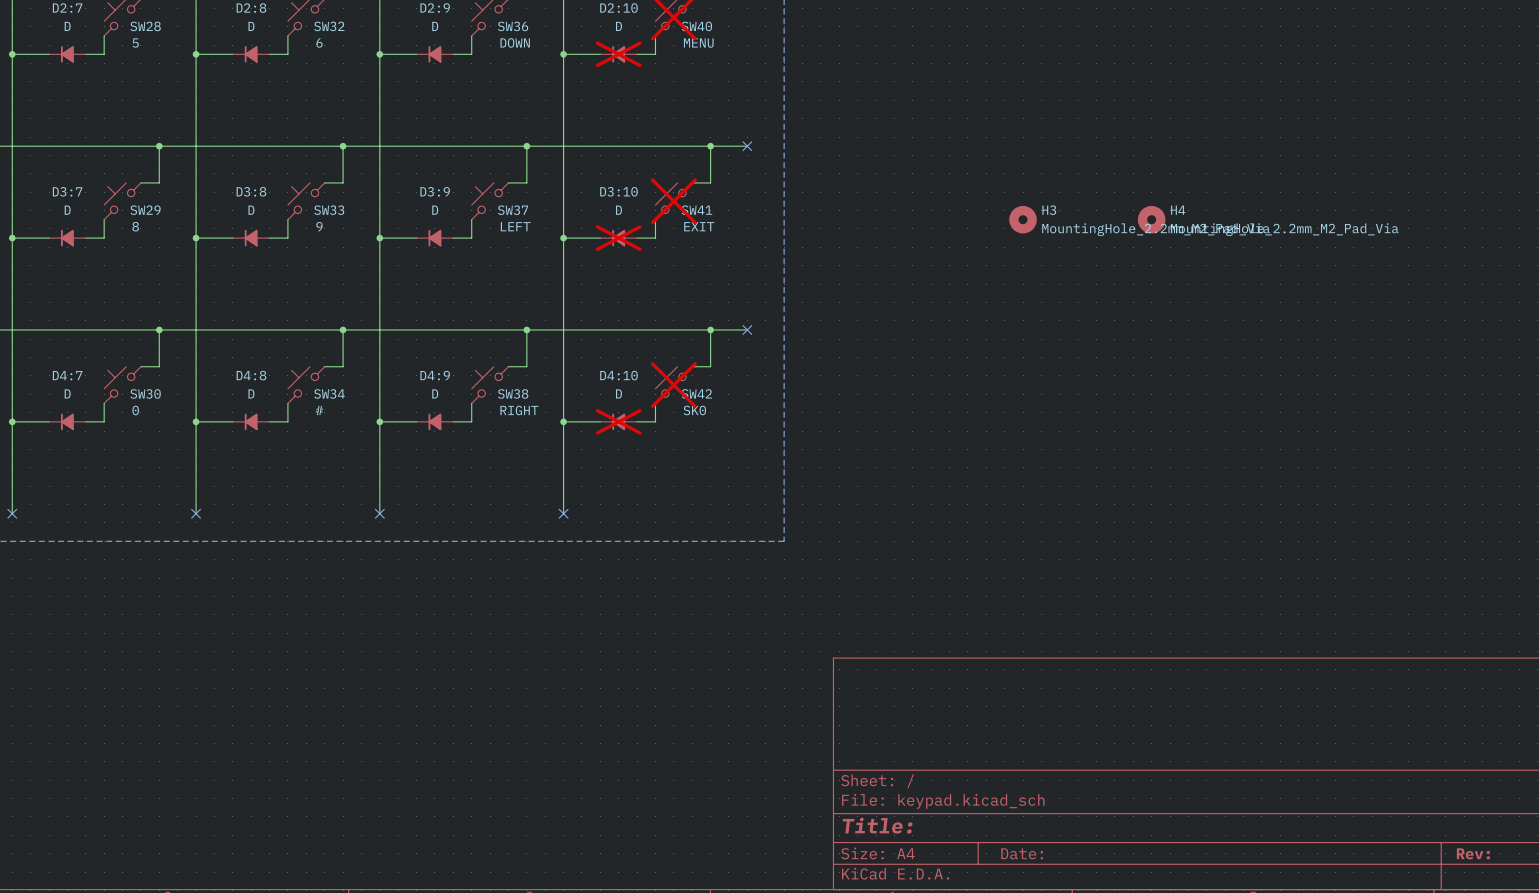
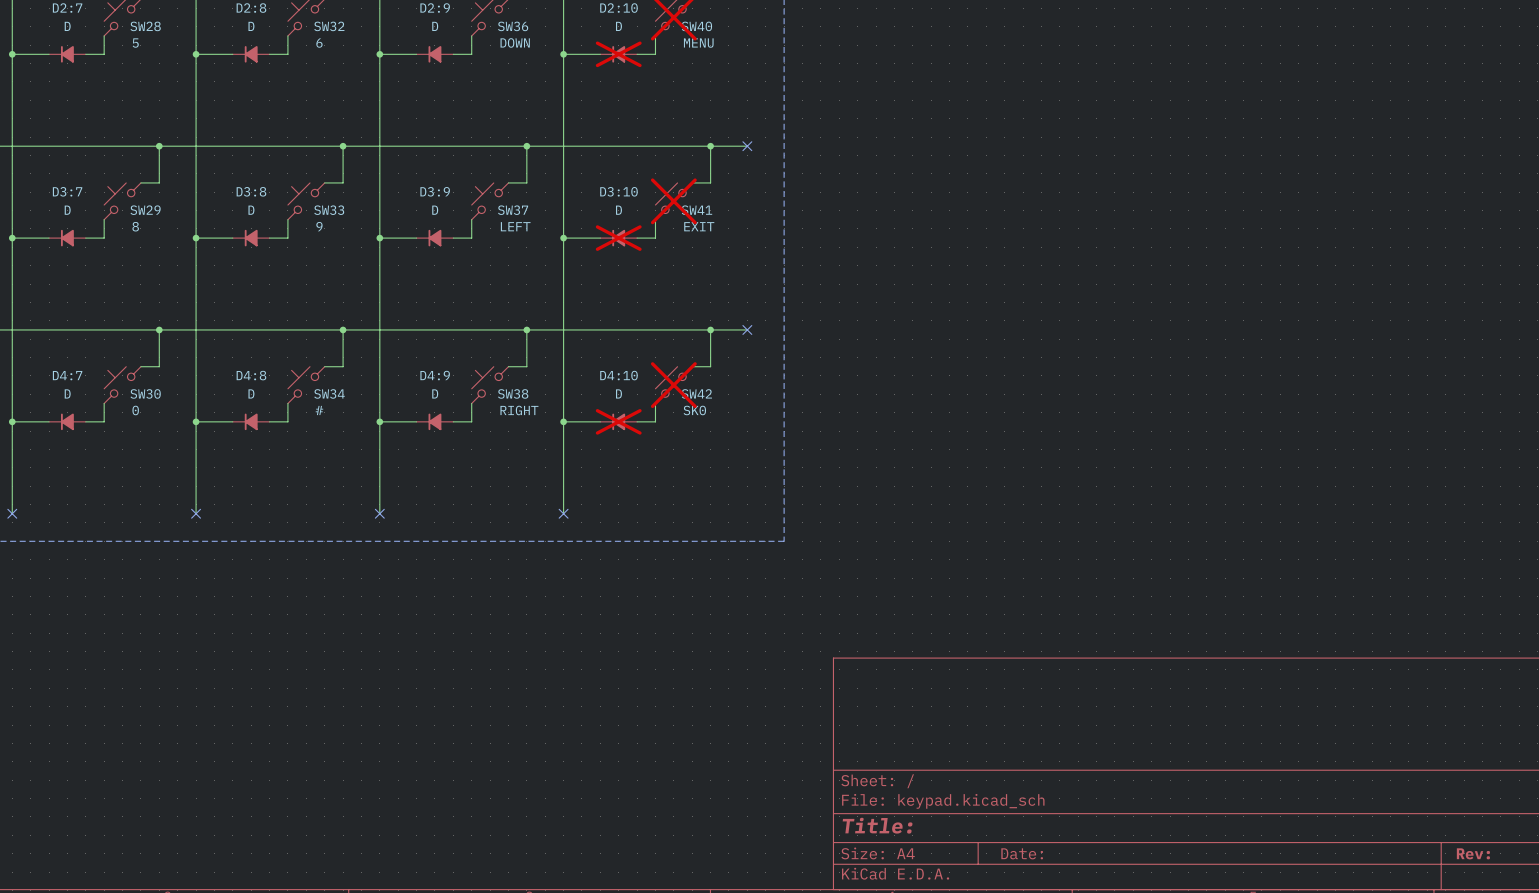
H3: MountingHole_2.2mm_M2_Pad_Via (1023, 219) -> none
H4: MountingHole_2.2mm_M2_Pad_Via (1151, 219) -> none

